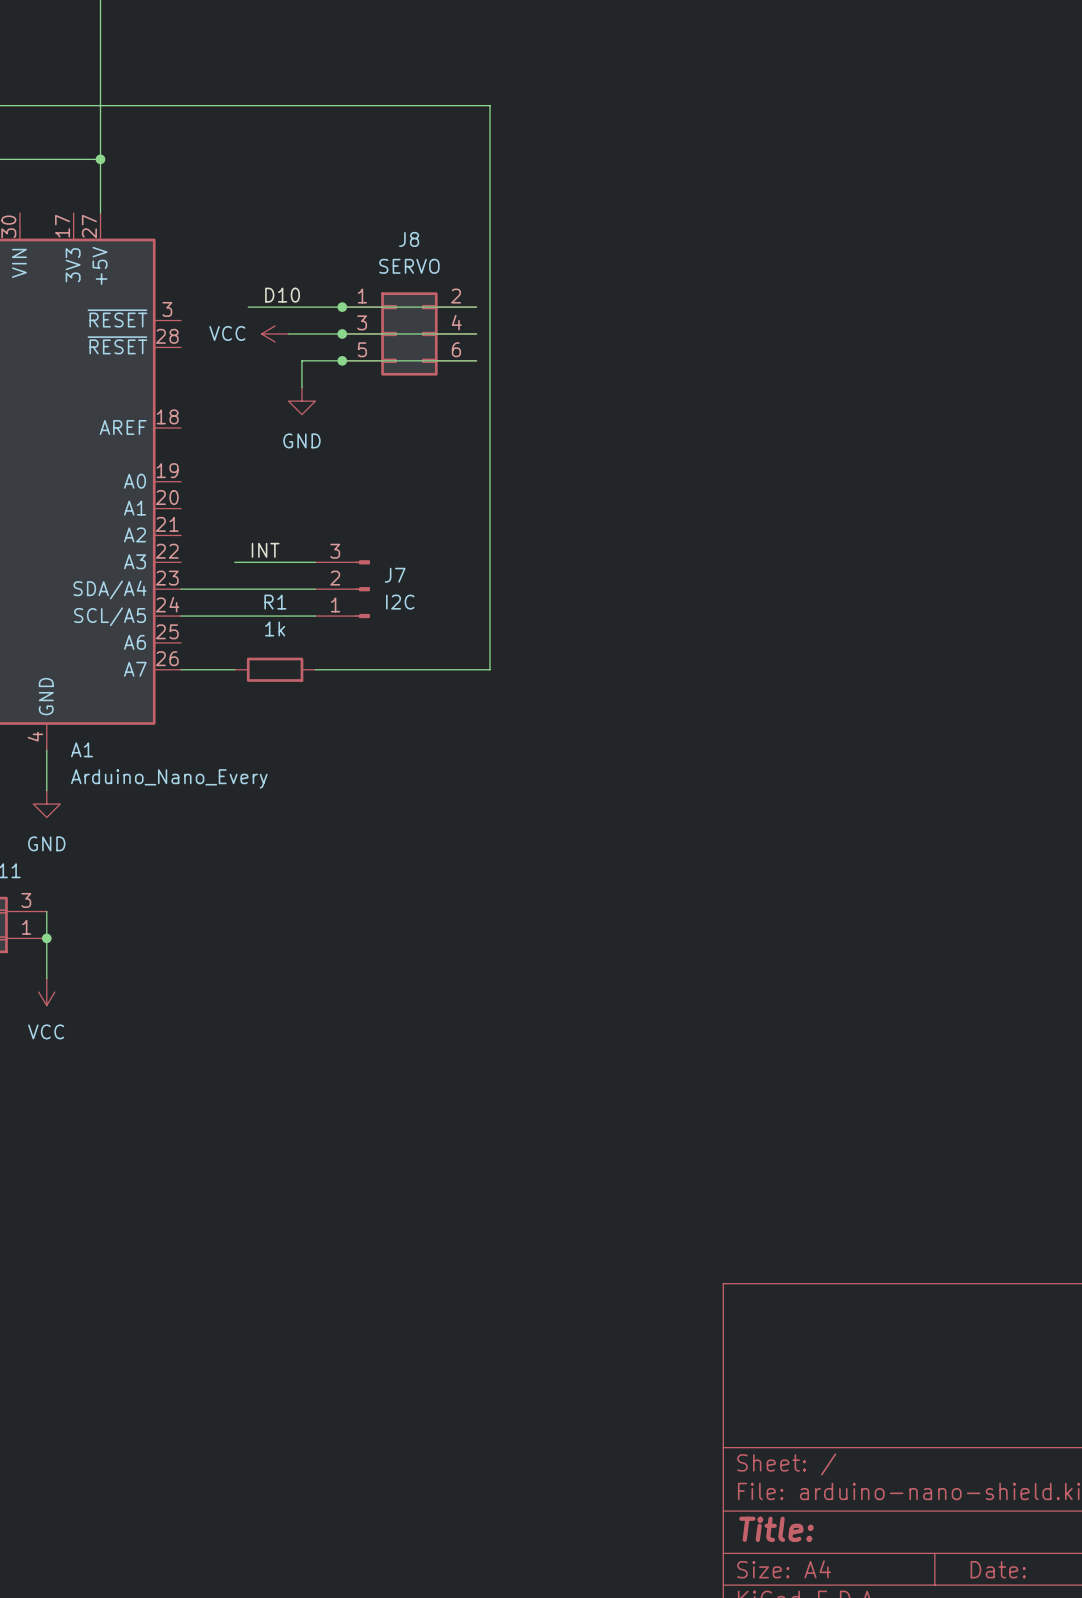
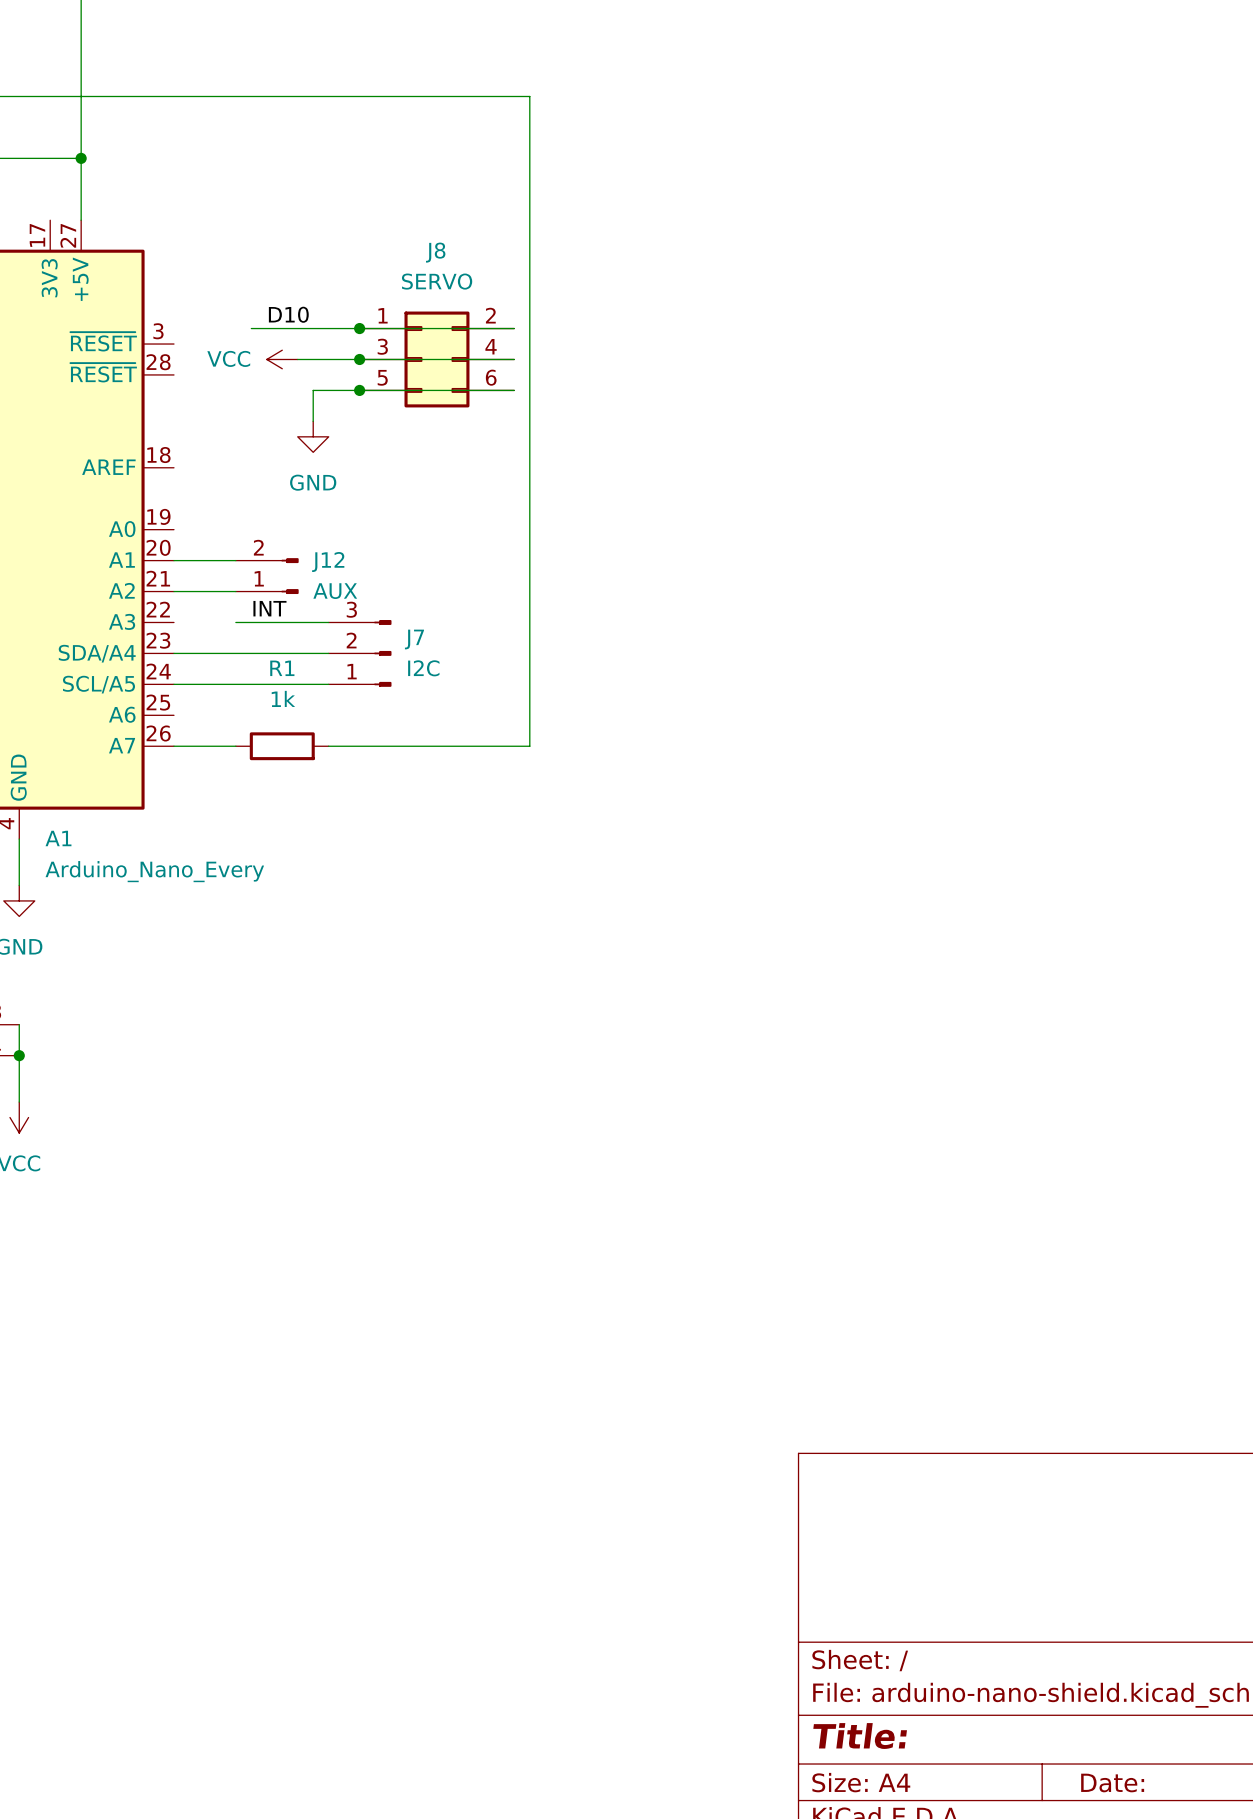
wire: none -> (173, 560) (235, 560)
J12: none -> AUX (267, 576)
wire: none -> (173, 591) (235, 591)

